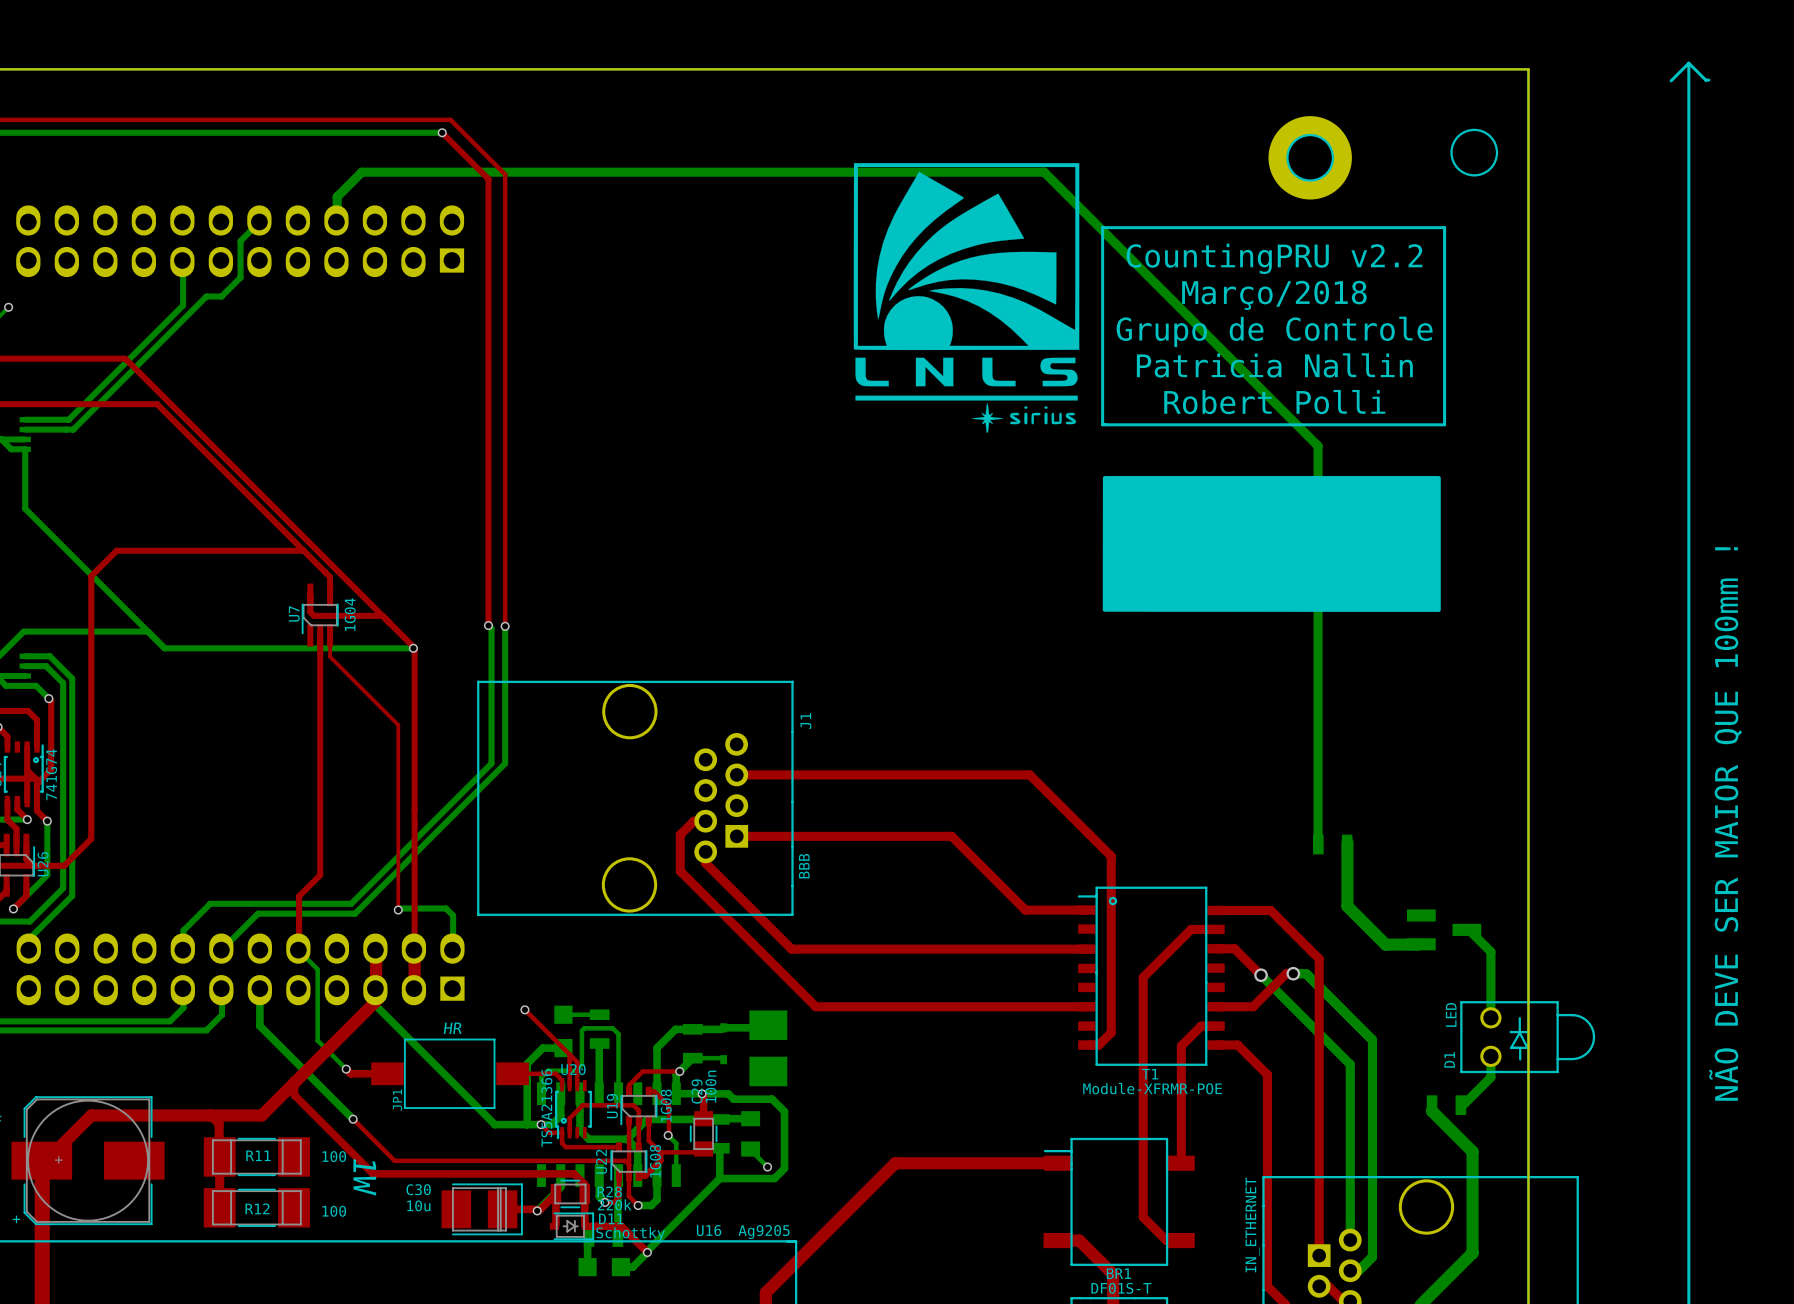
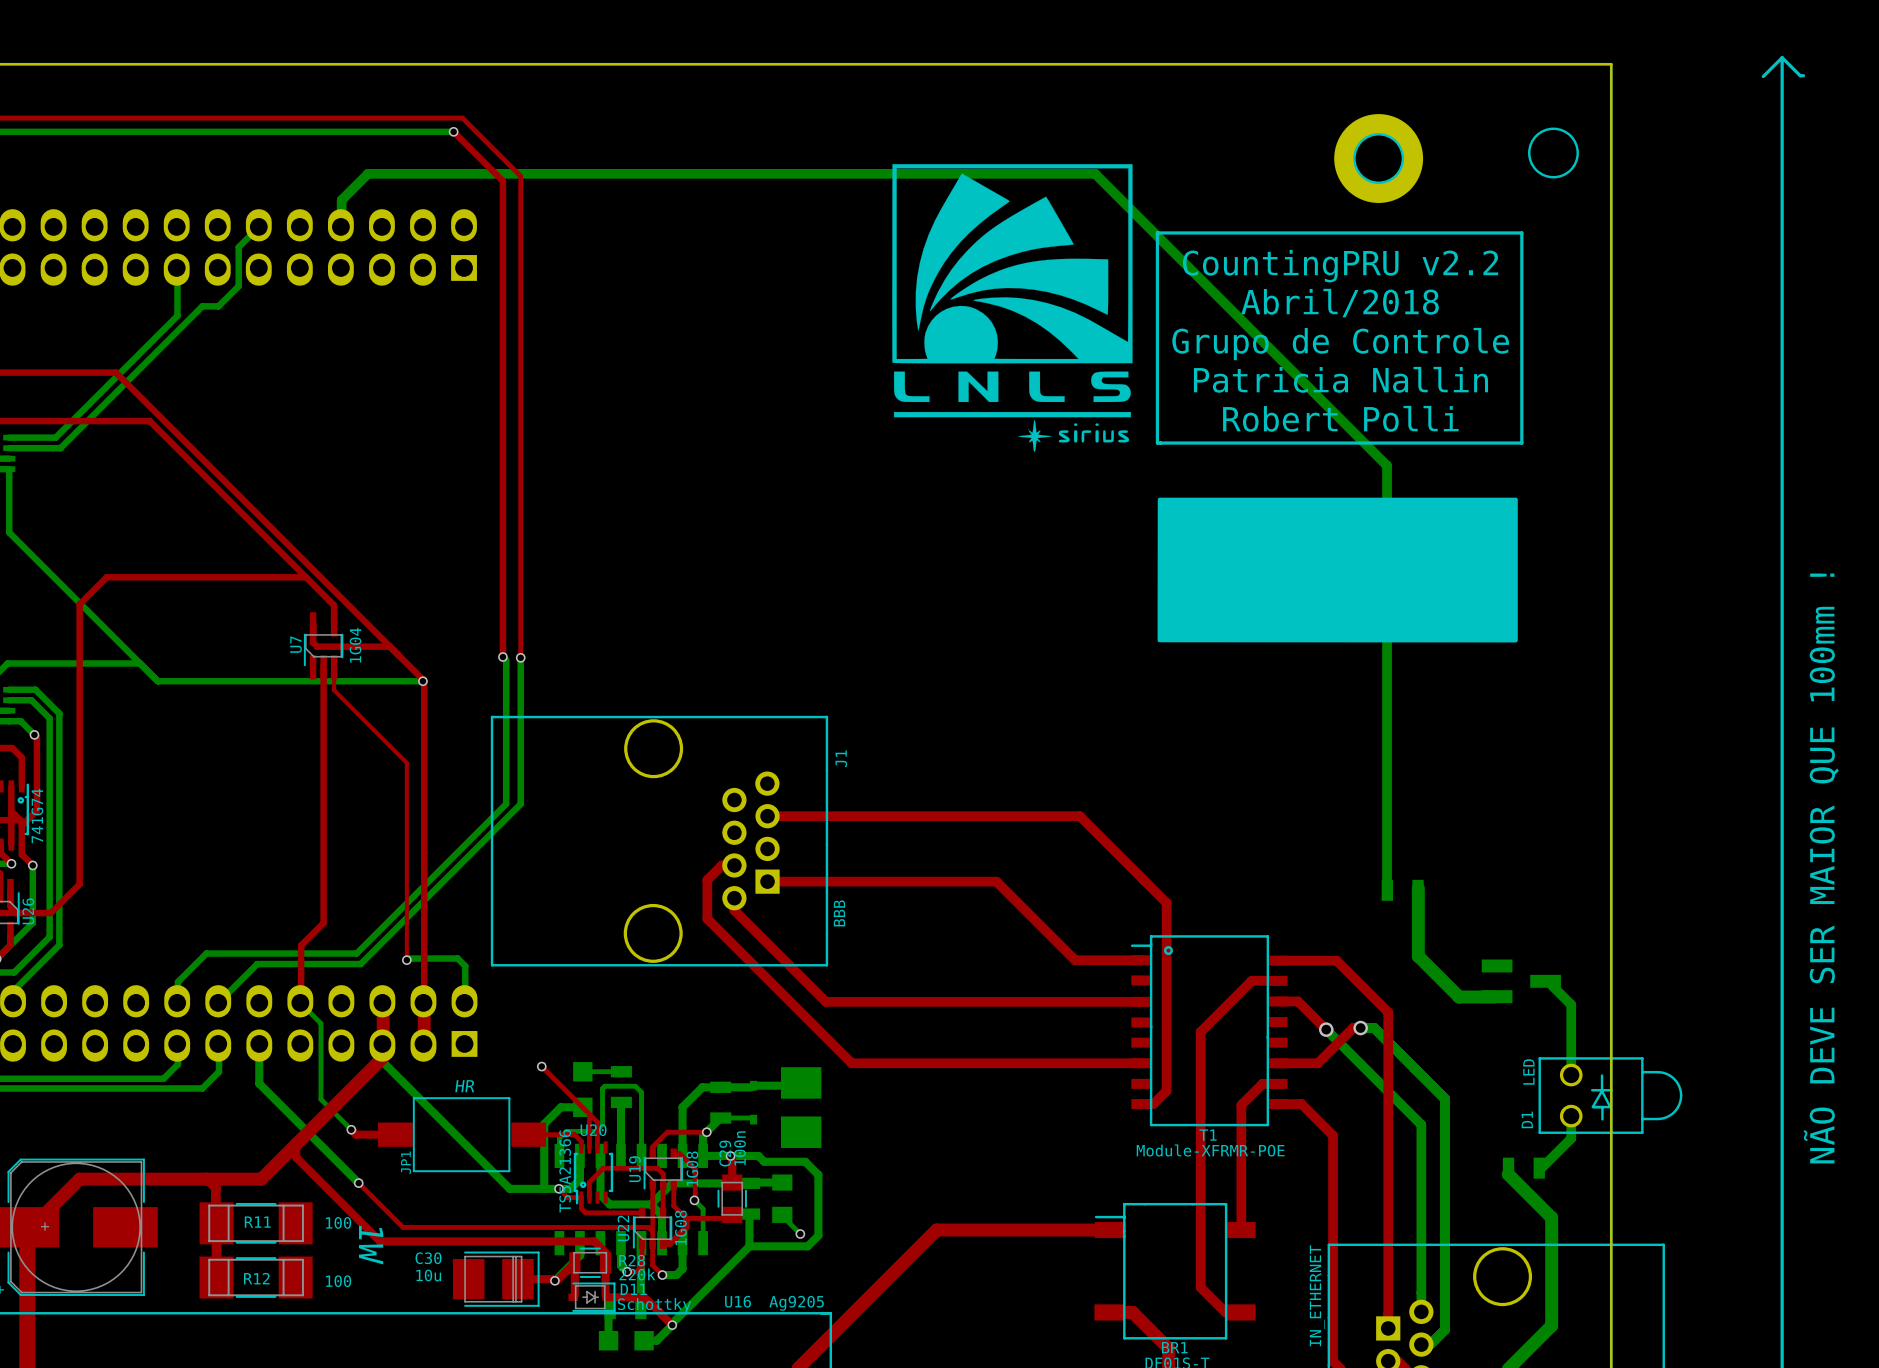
text: Março/2018 (1274, 295) -> Abril/2018 (1340, 303)

